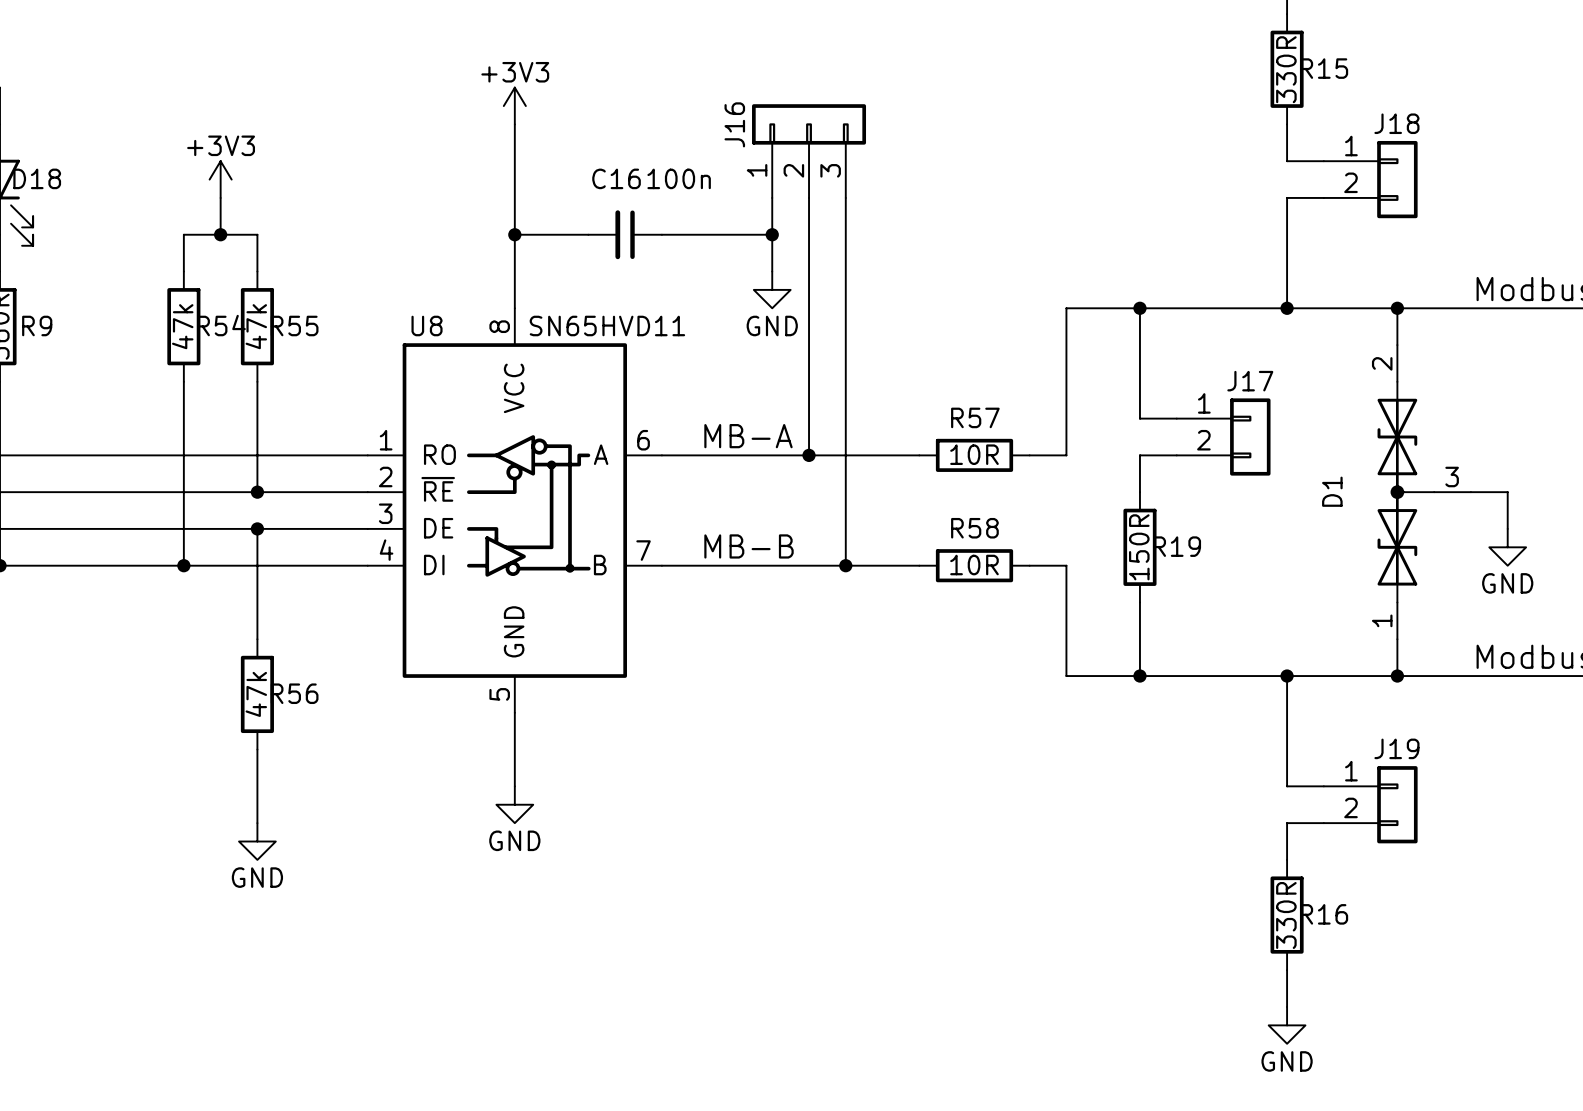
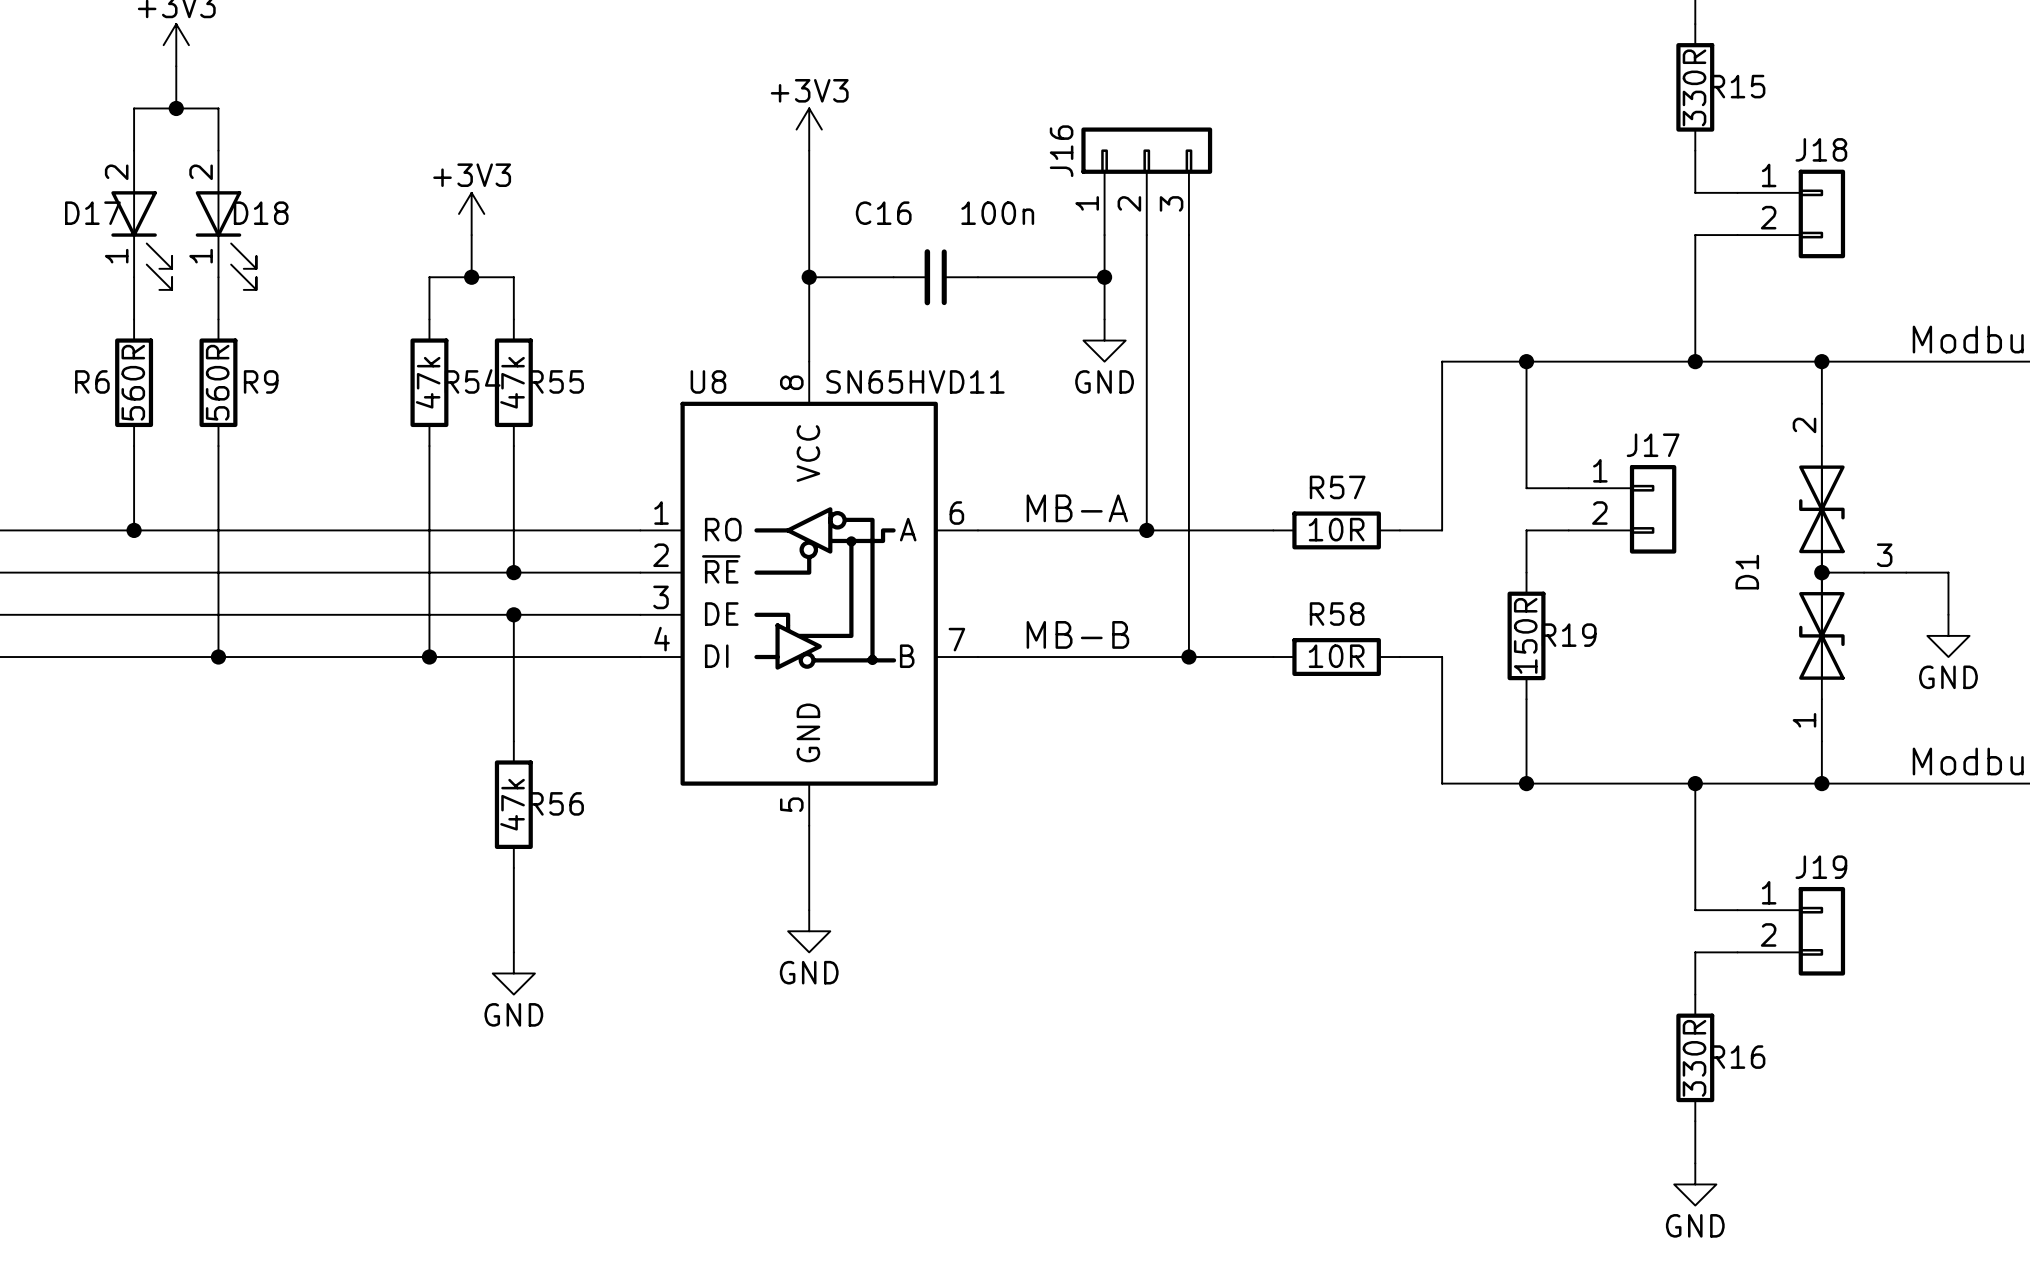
C16 name position: C16 (616, 178) -> C16 (883, 213)

